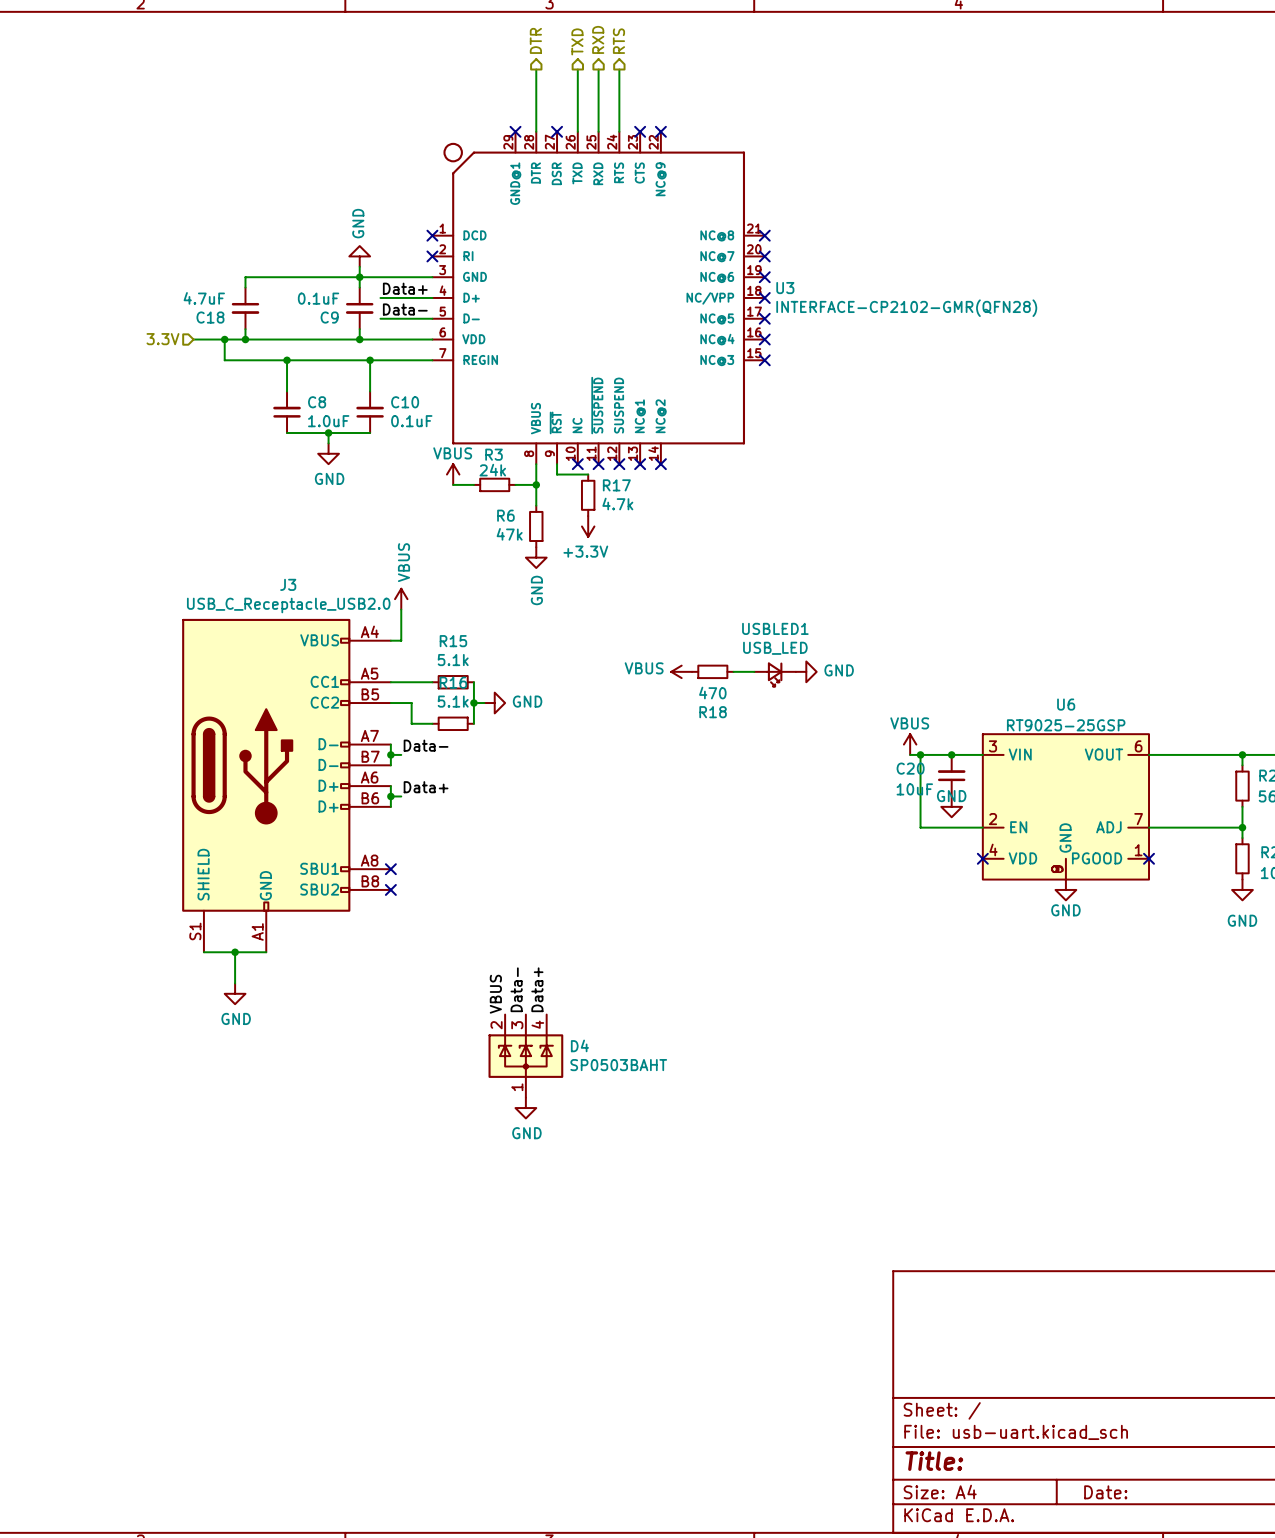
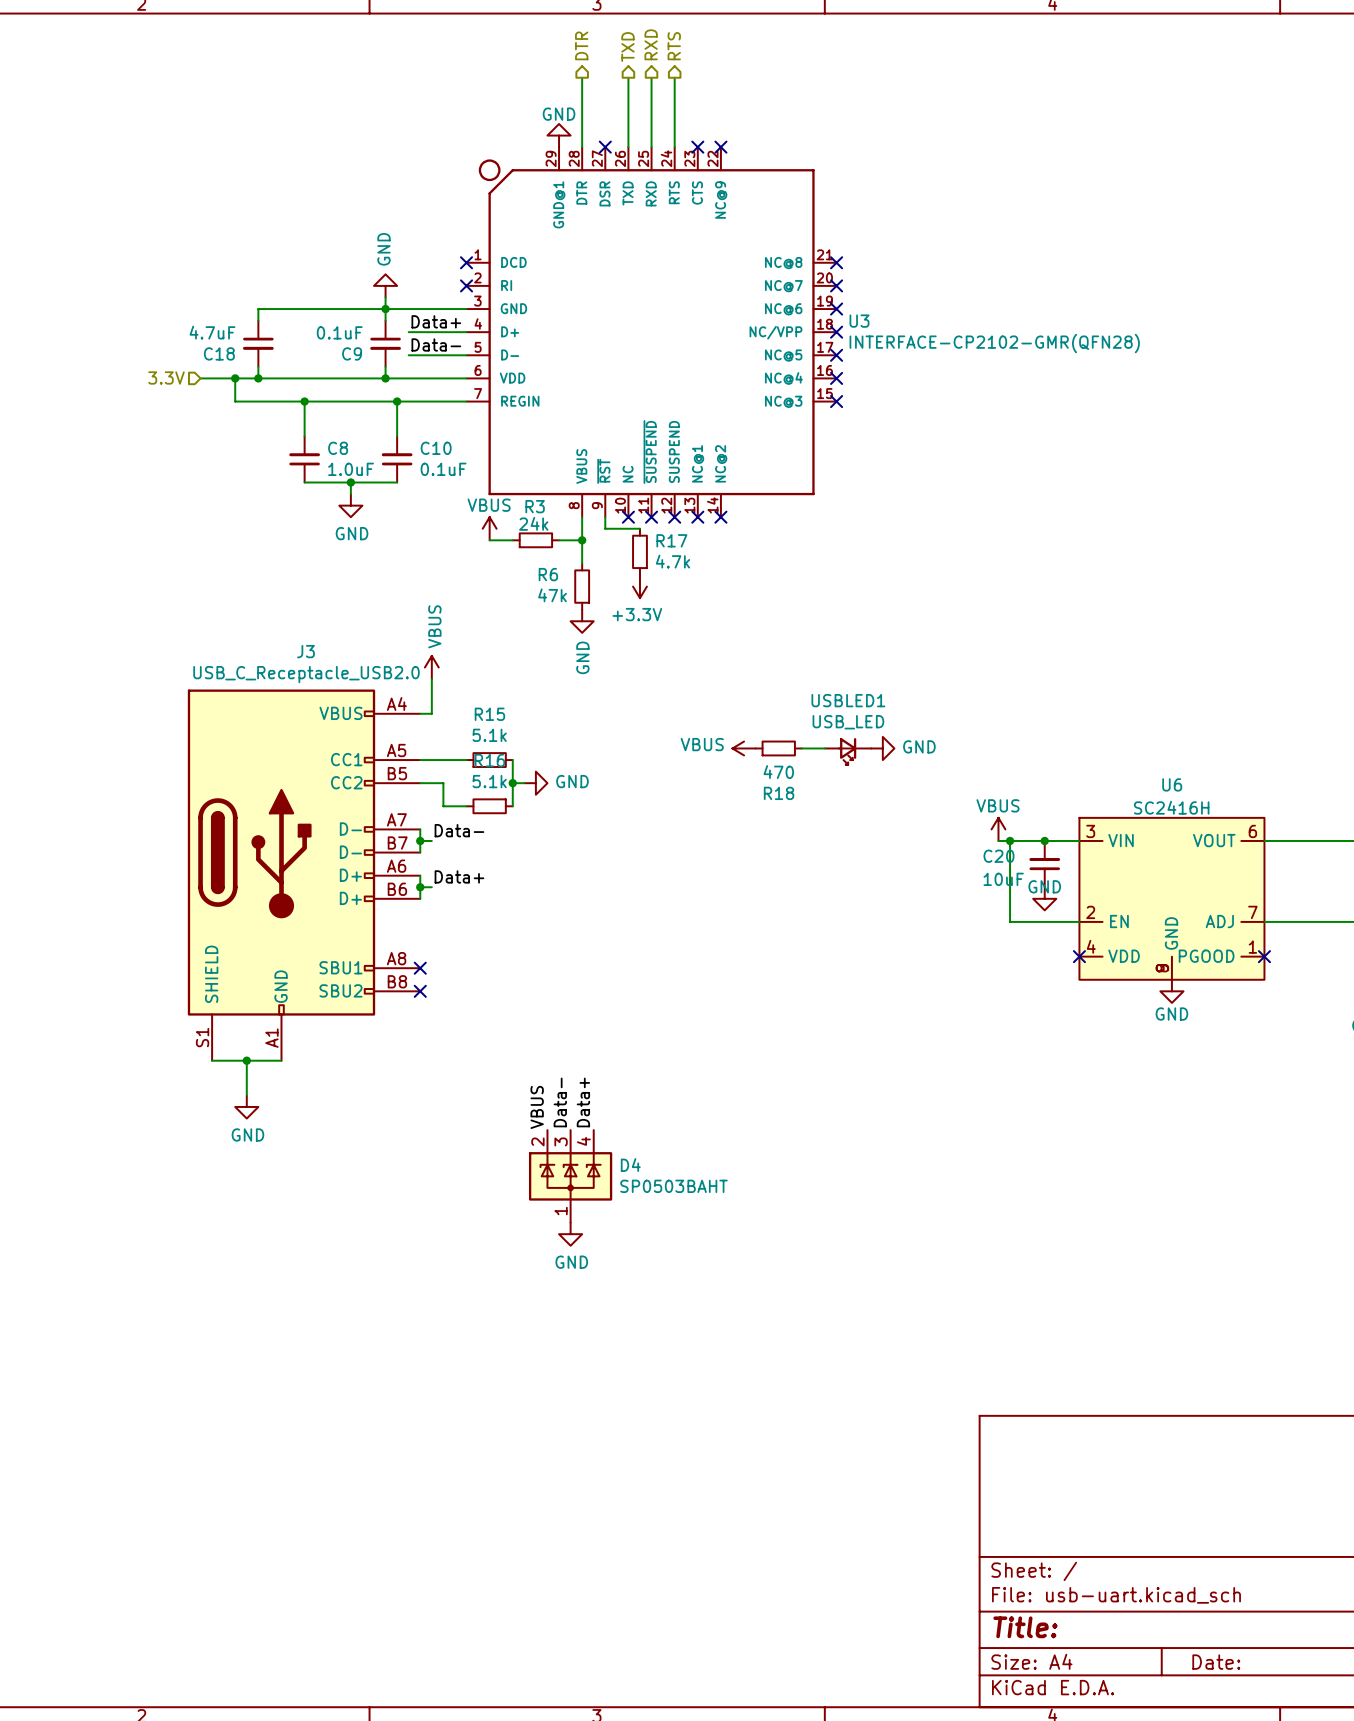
power symbol: none -> GND (559, 135)
no-connect mark: (515, 131) -> none
U6 value: RT9025-25GSP (1066, 725) -> SC2416H (1171, 807)

